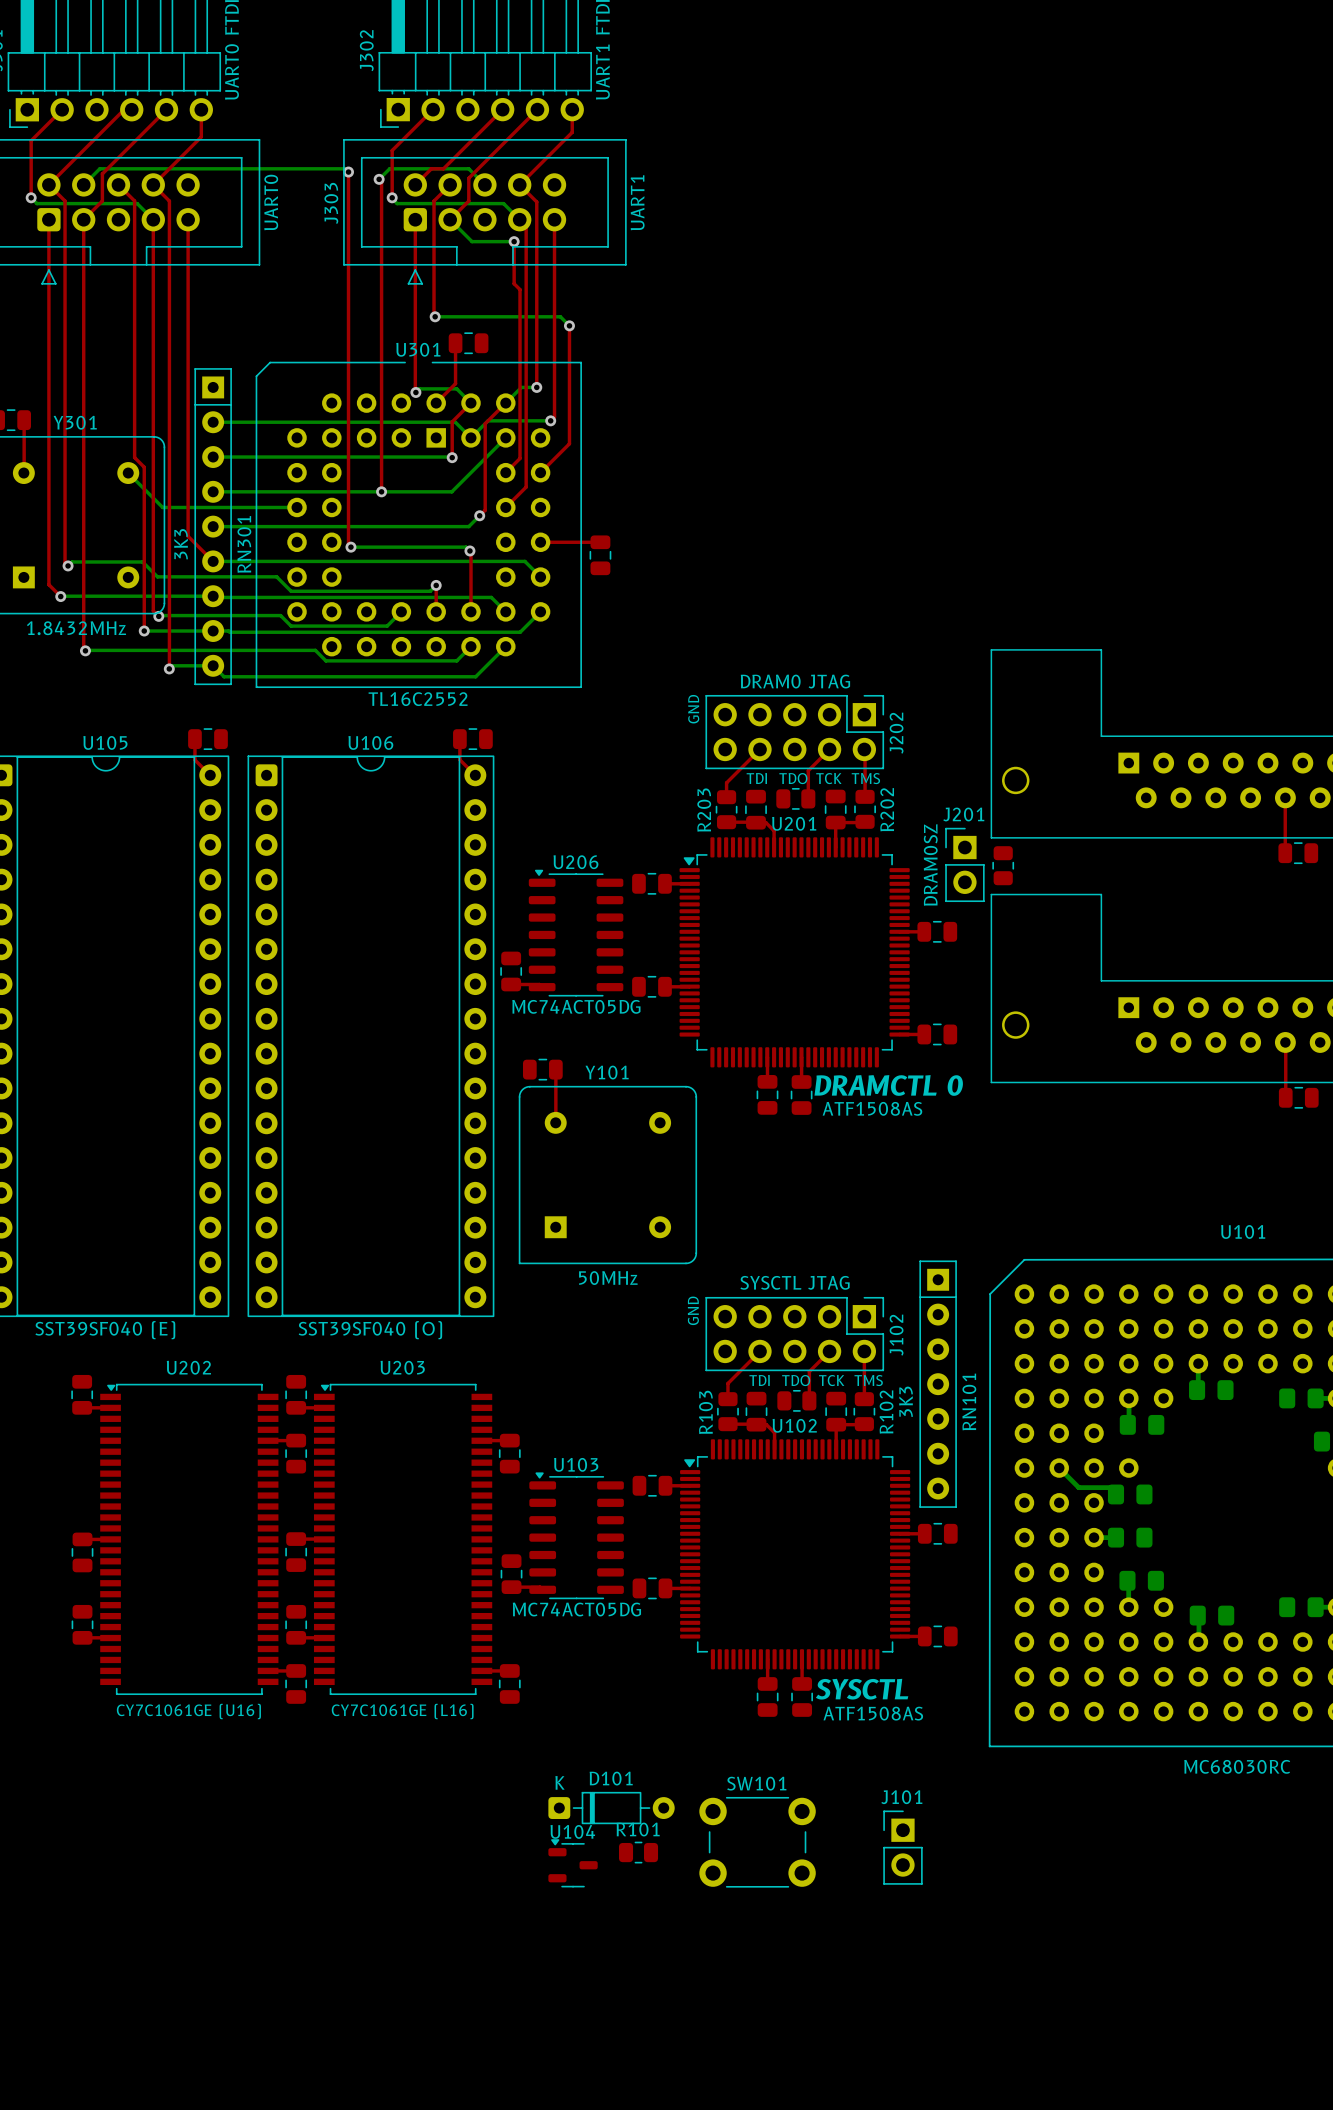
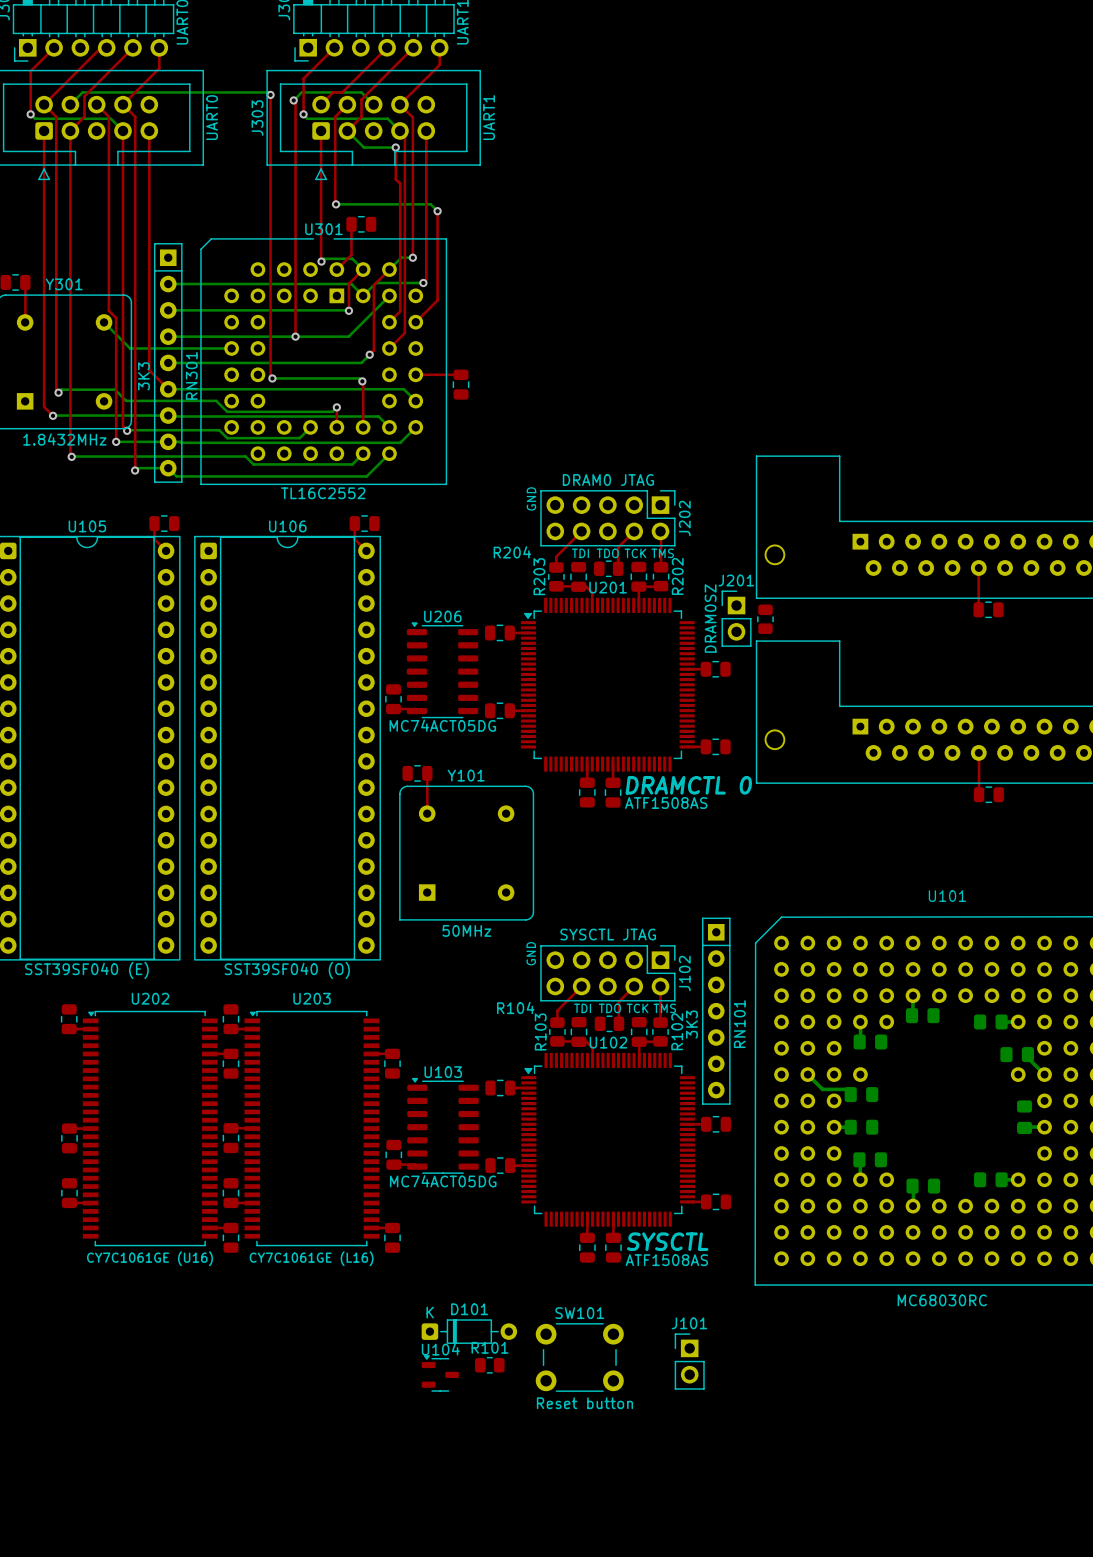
R204 name: none -> R204 (512, 552)
R104 name: none -> R104 (515, 1007)
SW101 value: none -> Reset button (584, 1403)

